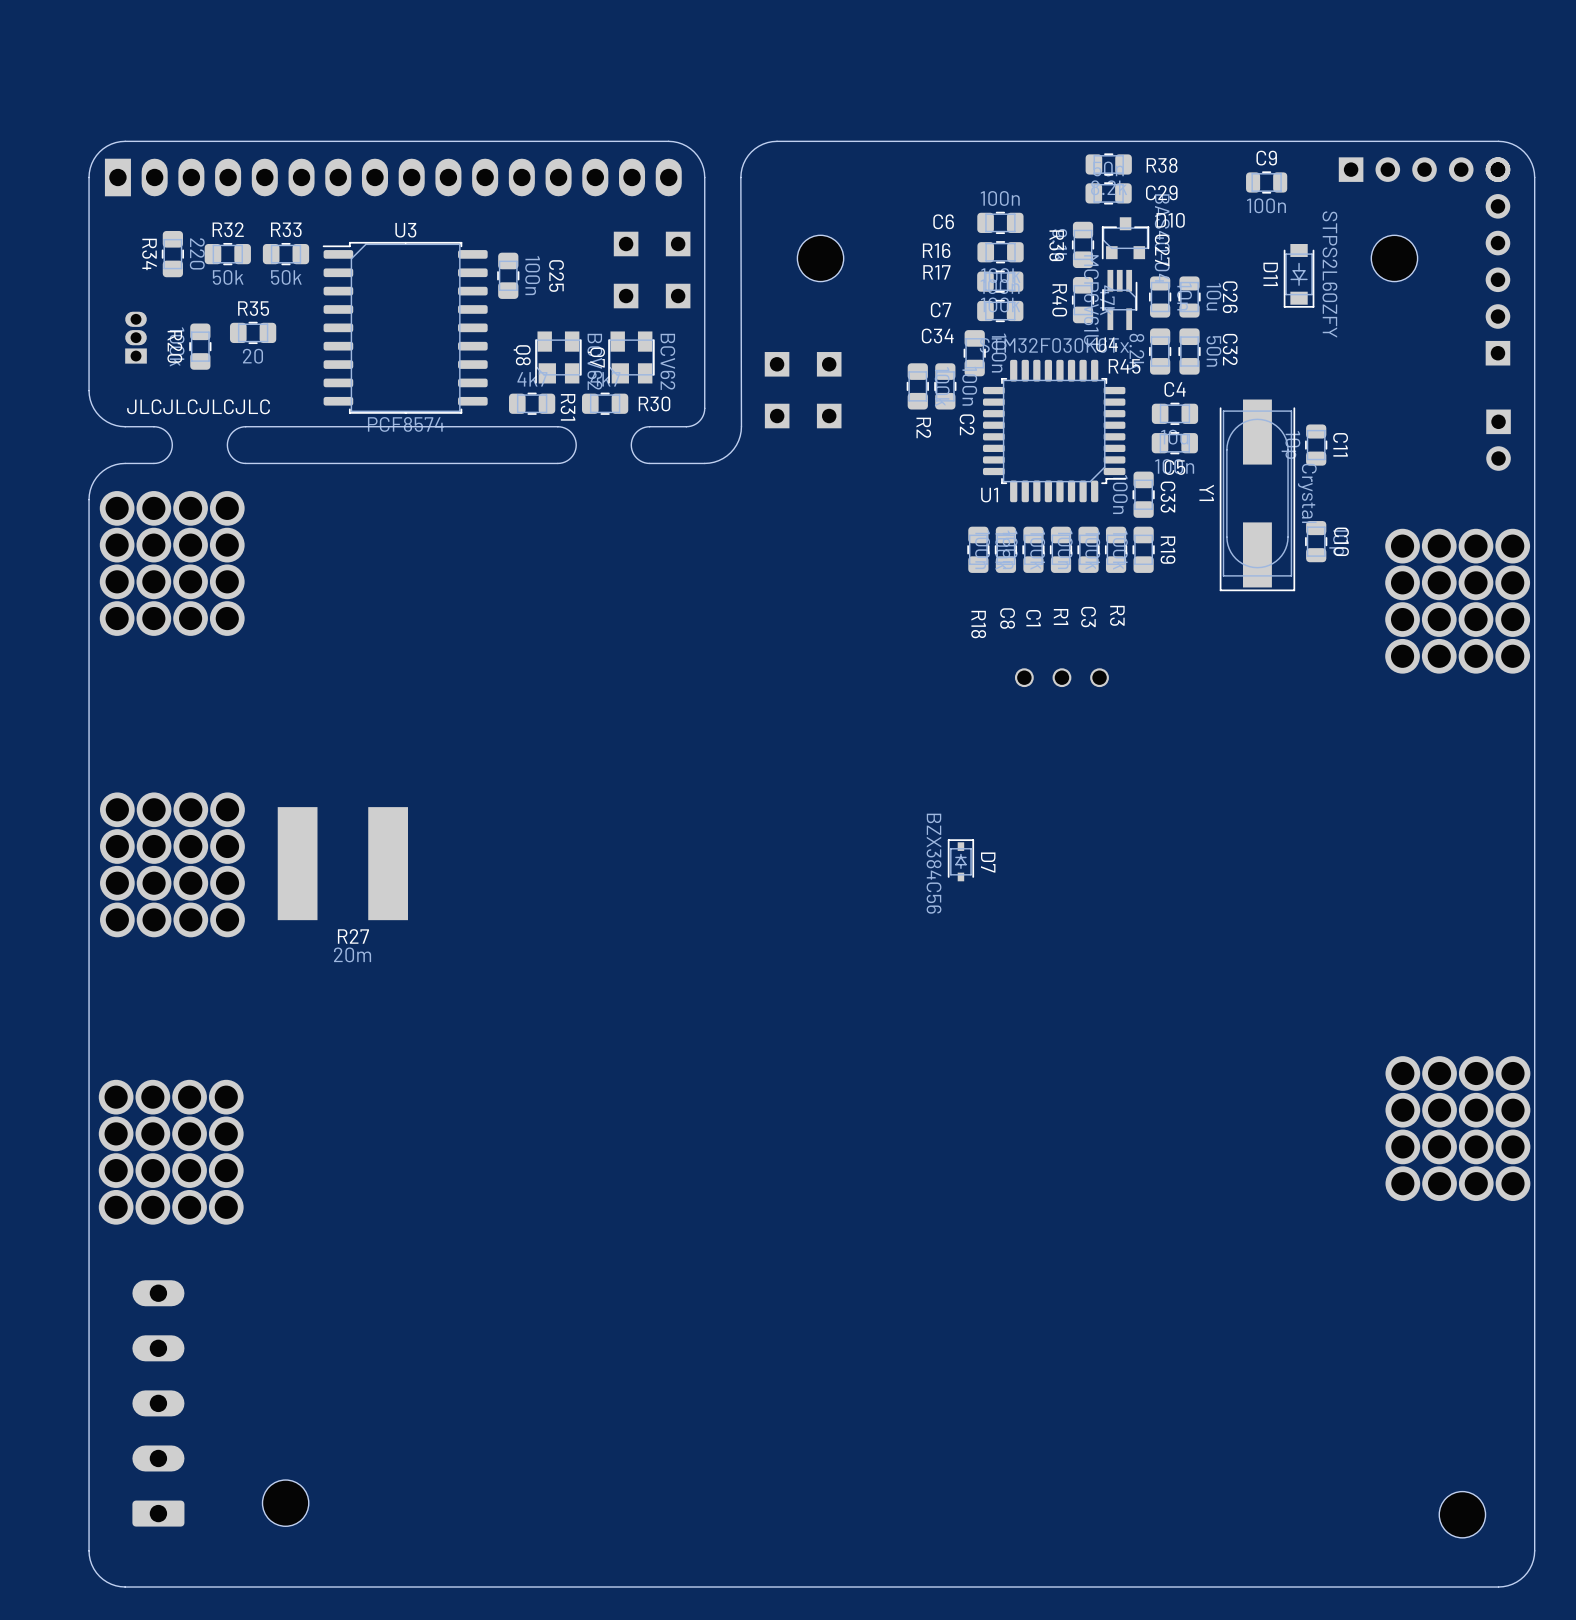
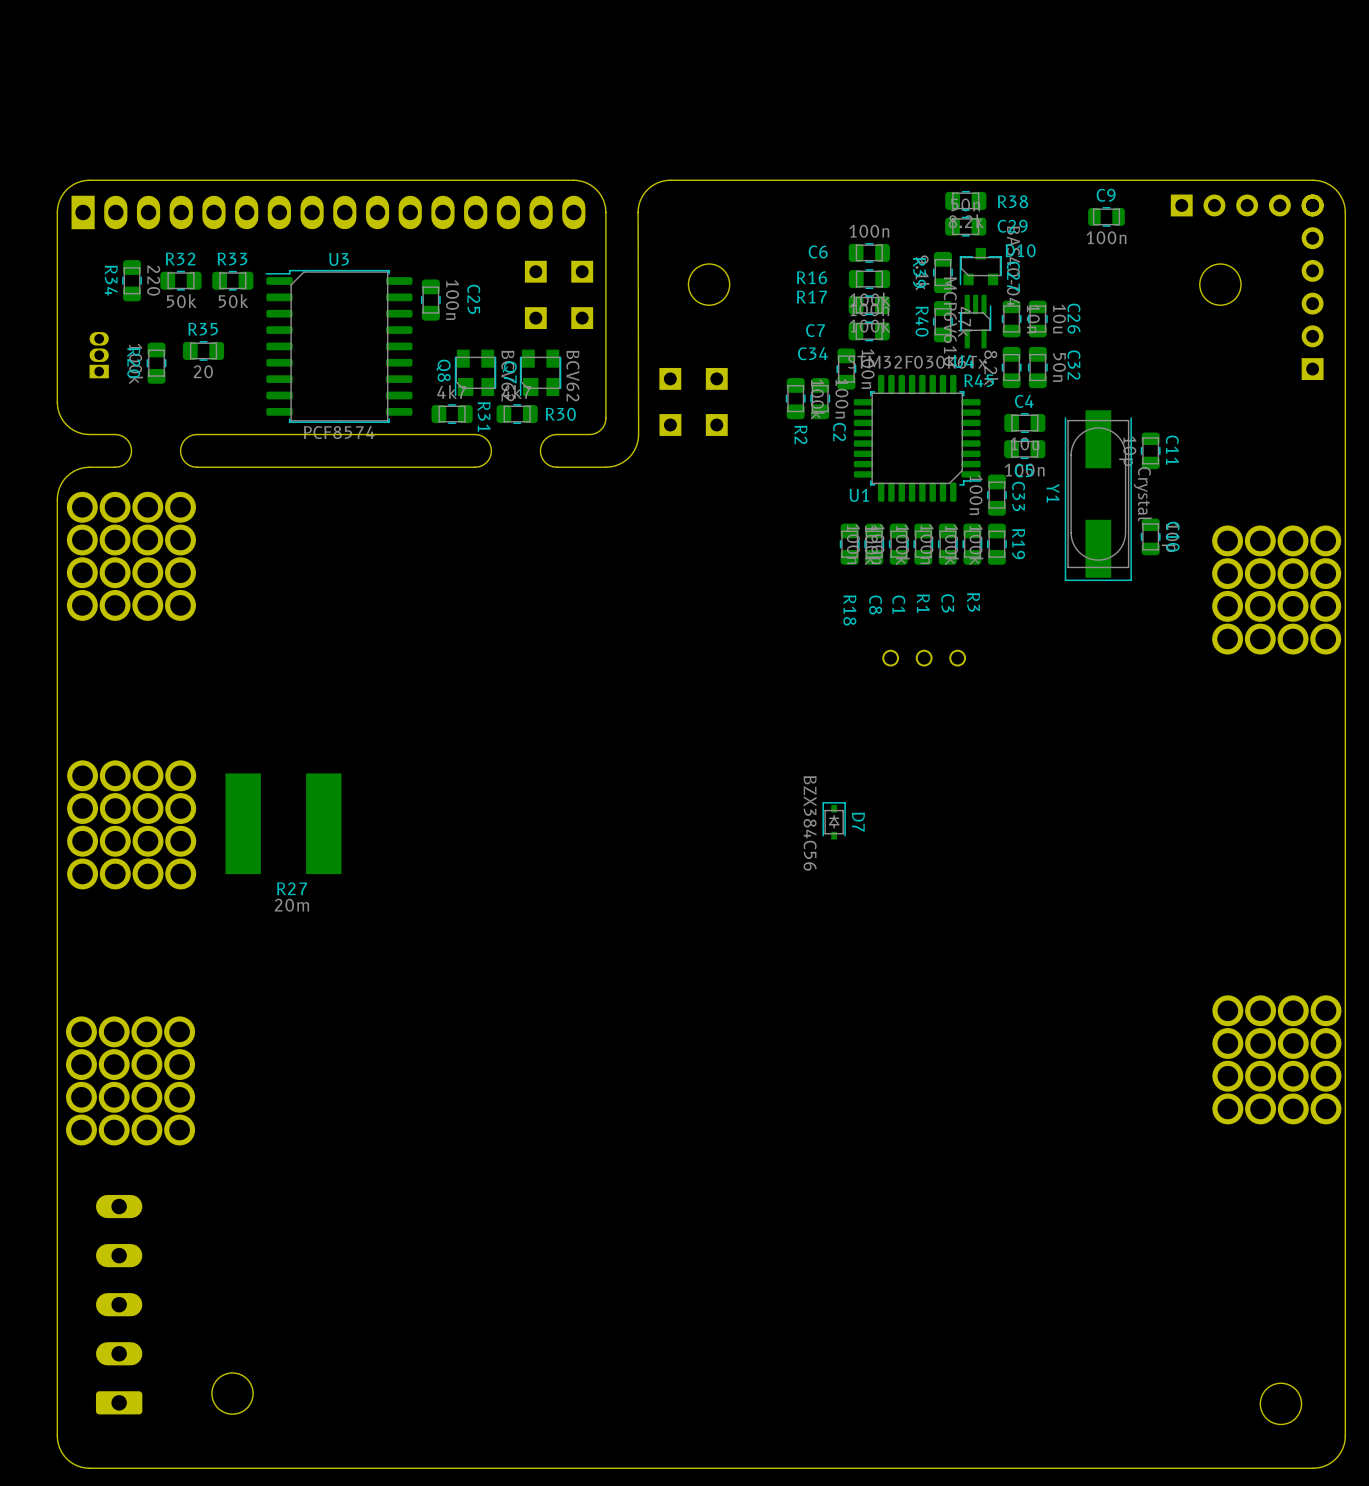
D11: STPS2L60ZFY (1299, 275) -> none
text: JLCJLCJLCJLC (198, 406) -> none
part: (1498, 440) -> none

